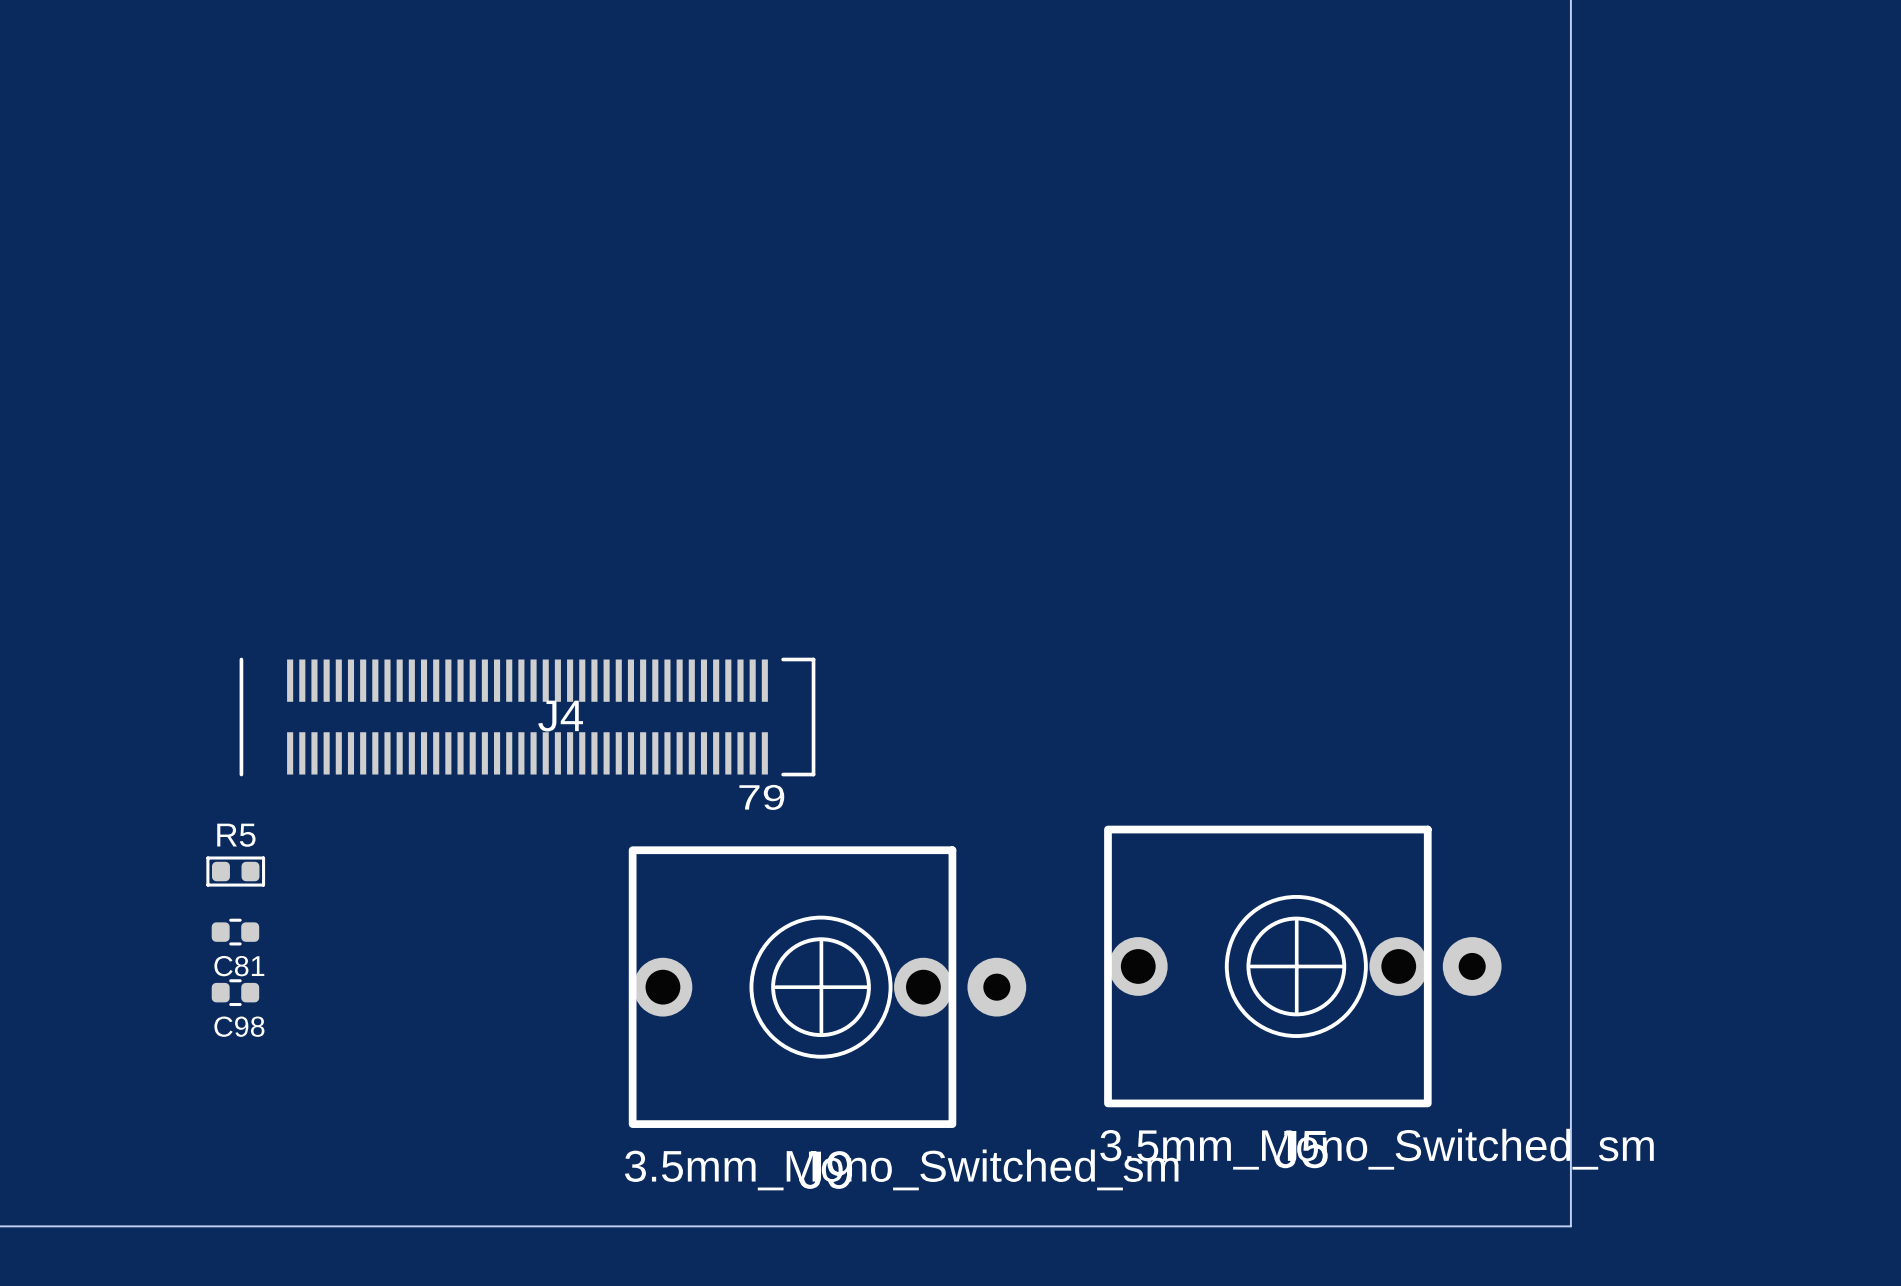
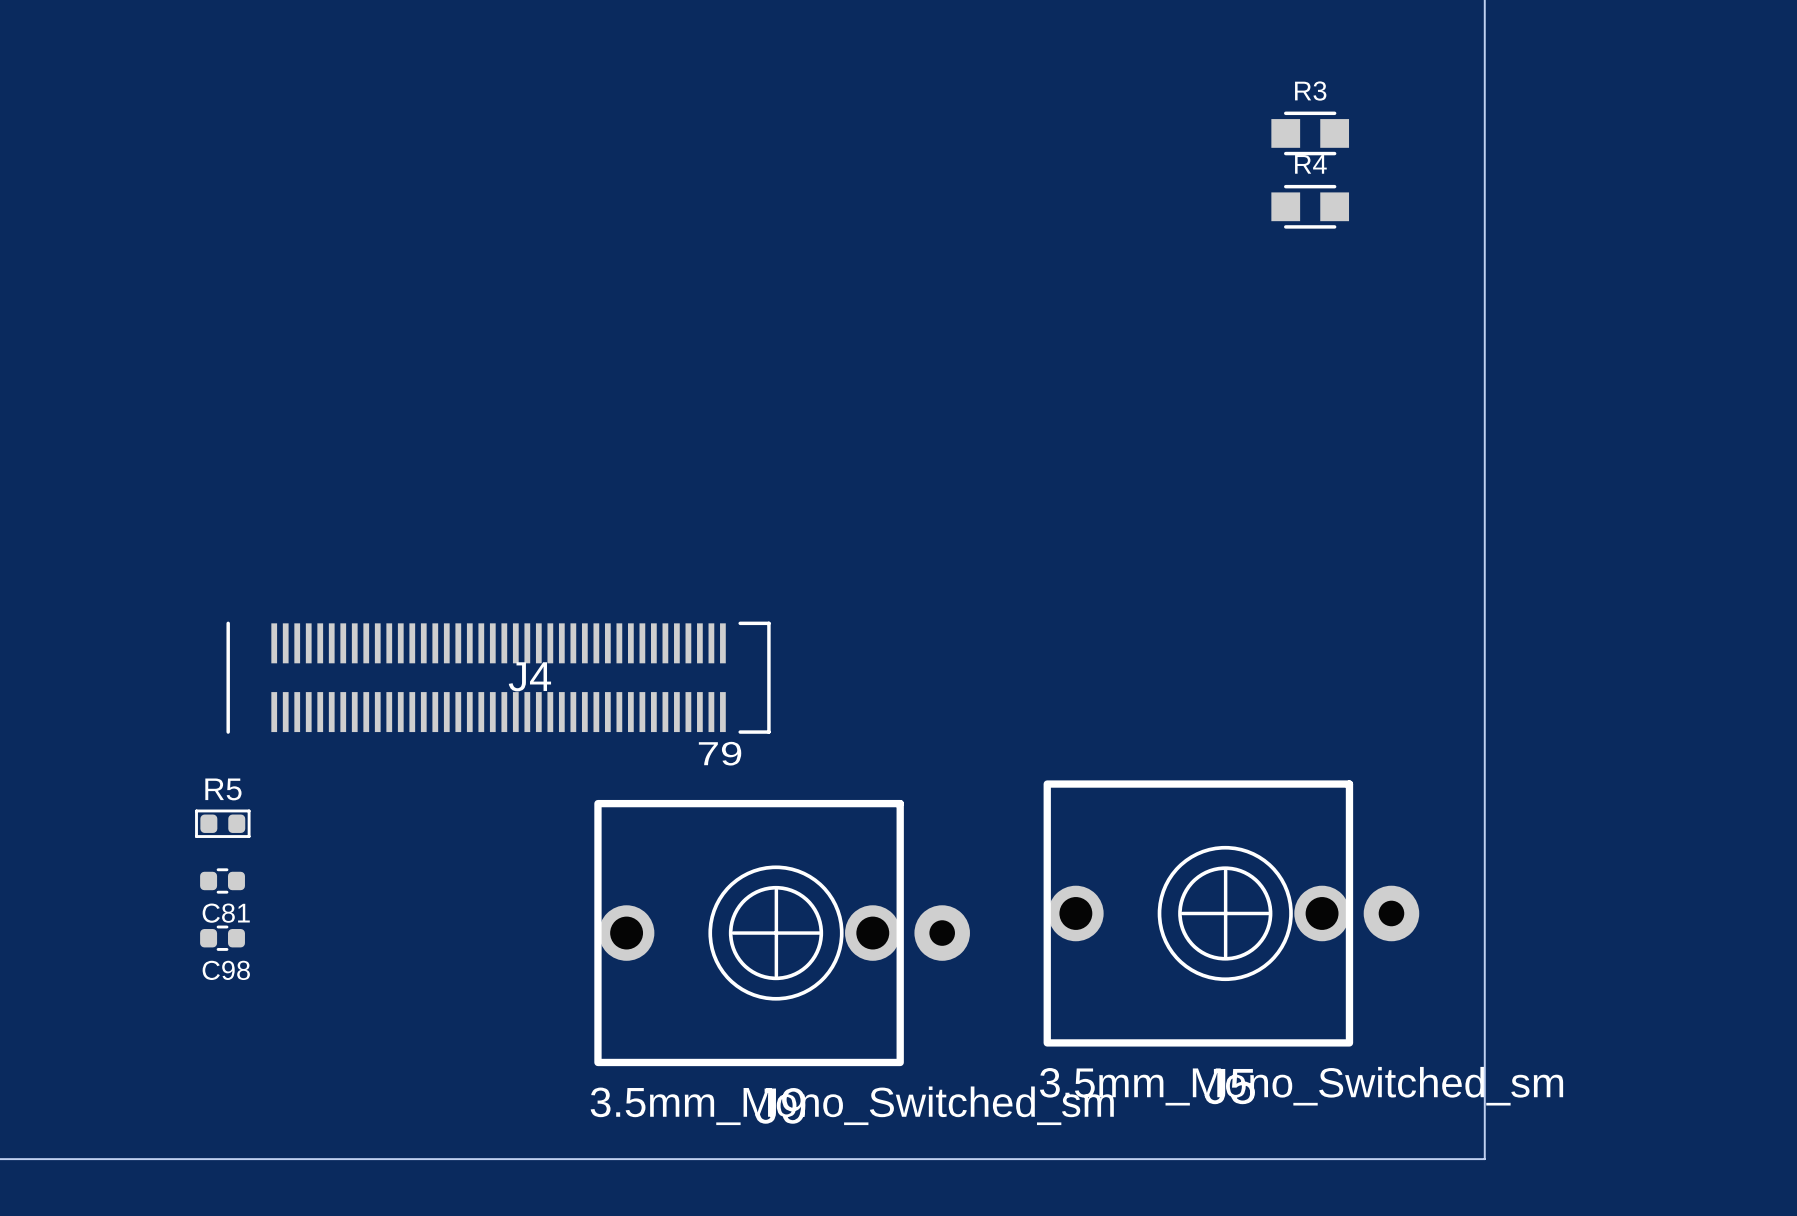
R3: none -> (1310, 133)
R4: none -> (1310, 206)

